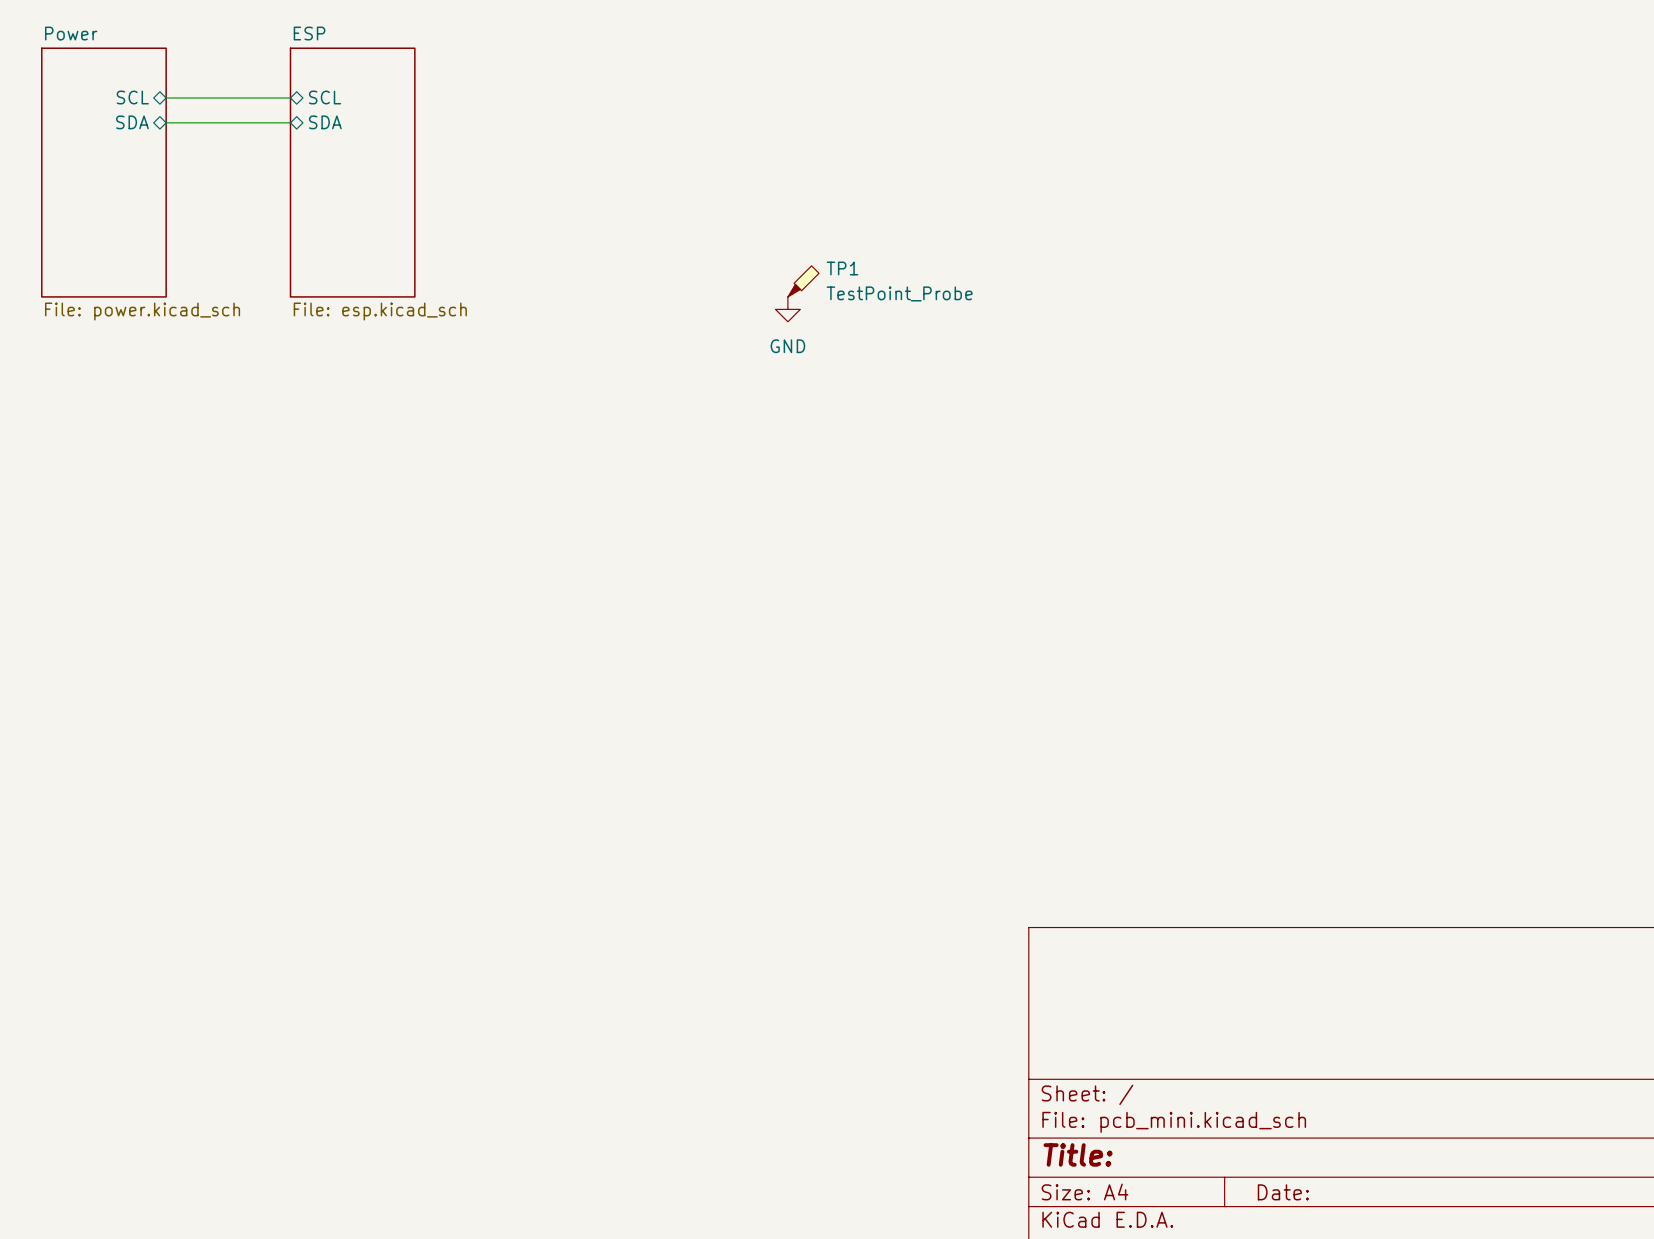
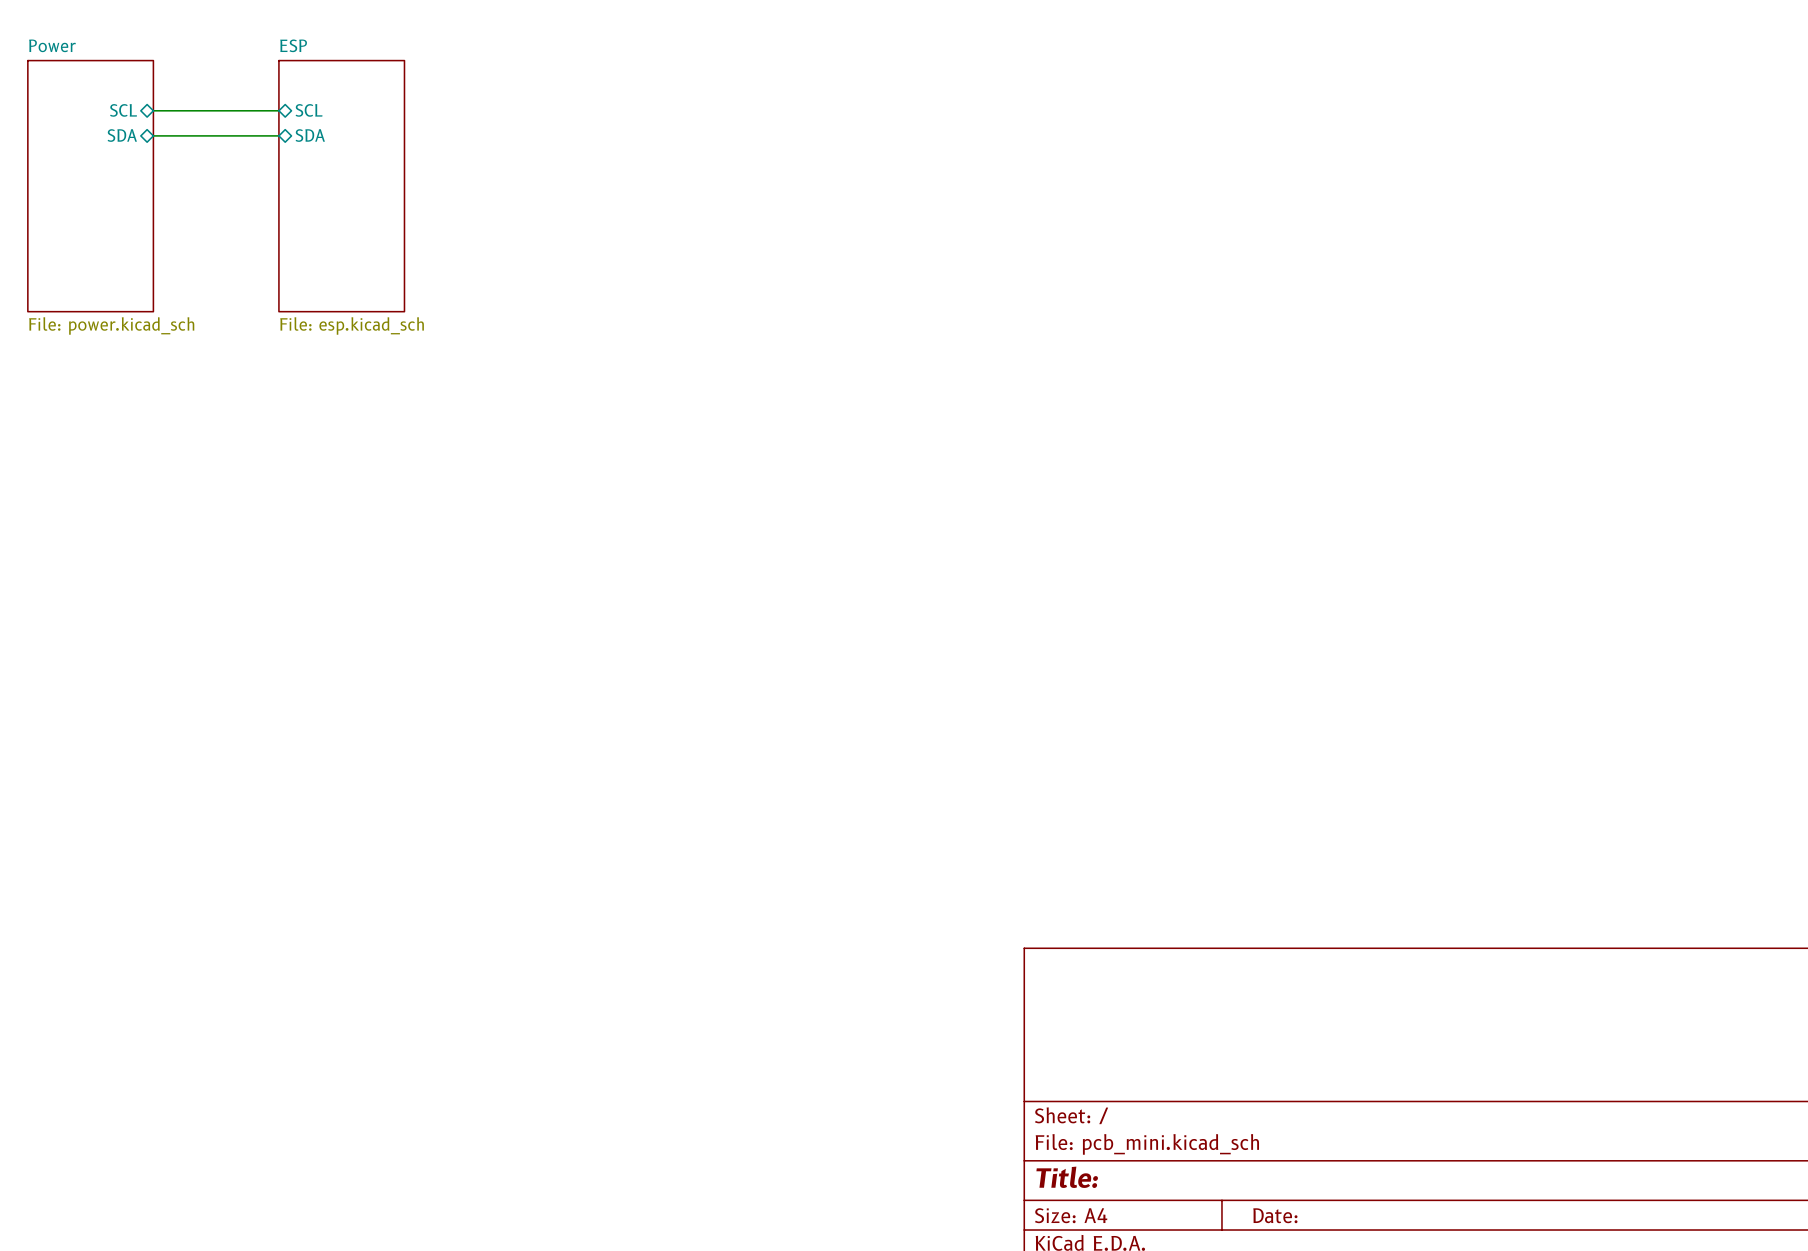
TP1: TestPoint_Probe (803, 281) -> none
power symbol: GND (787, 309) -> none

